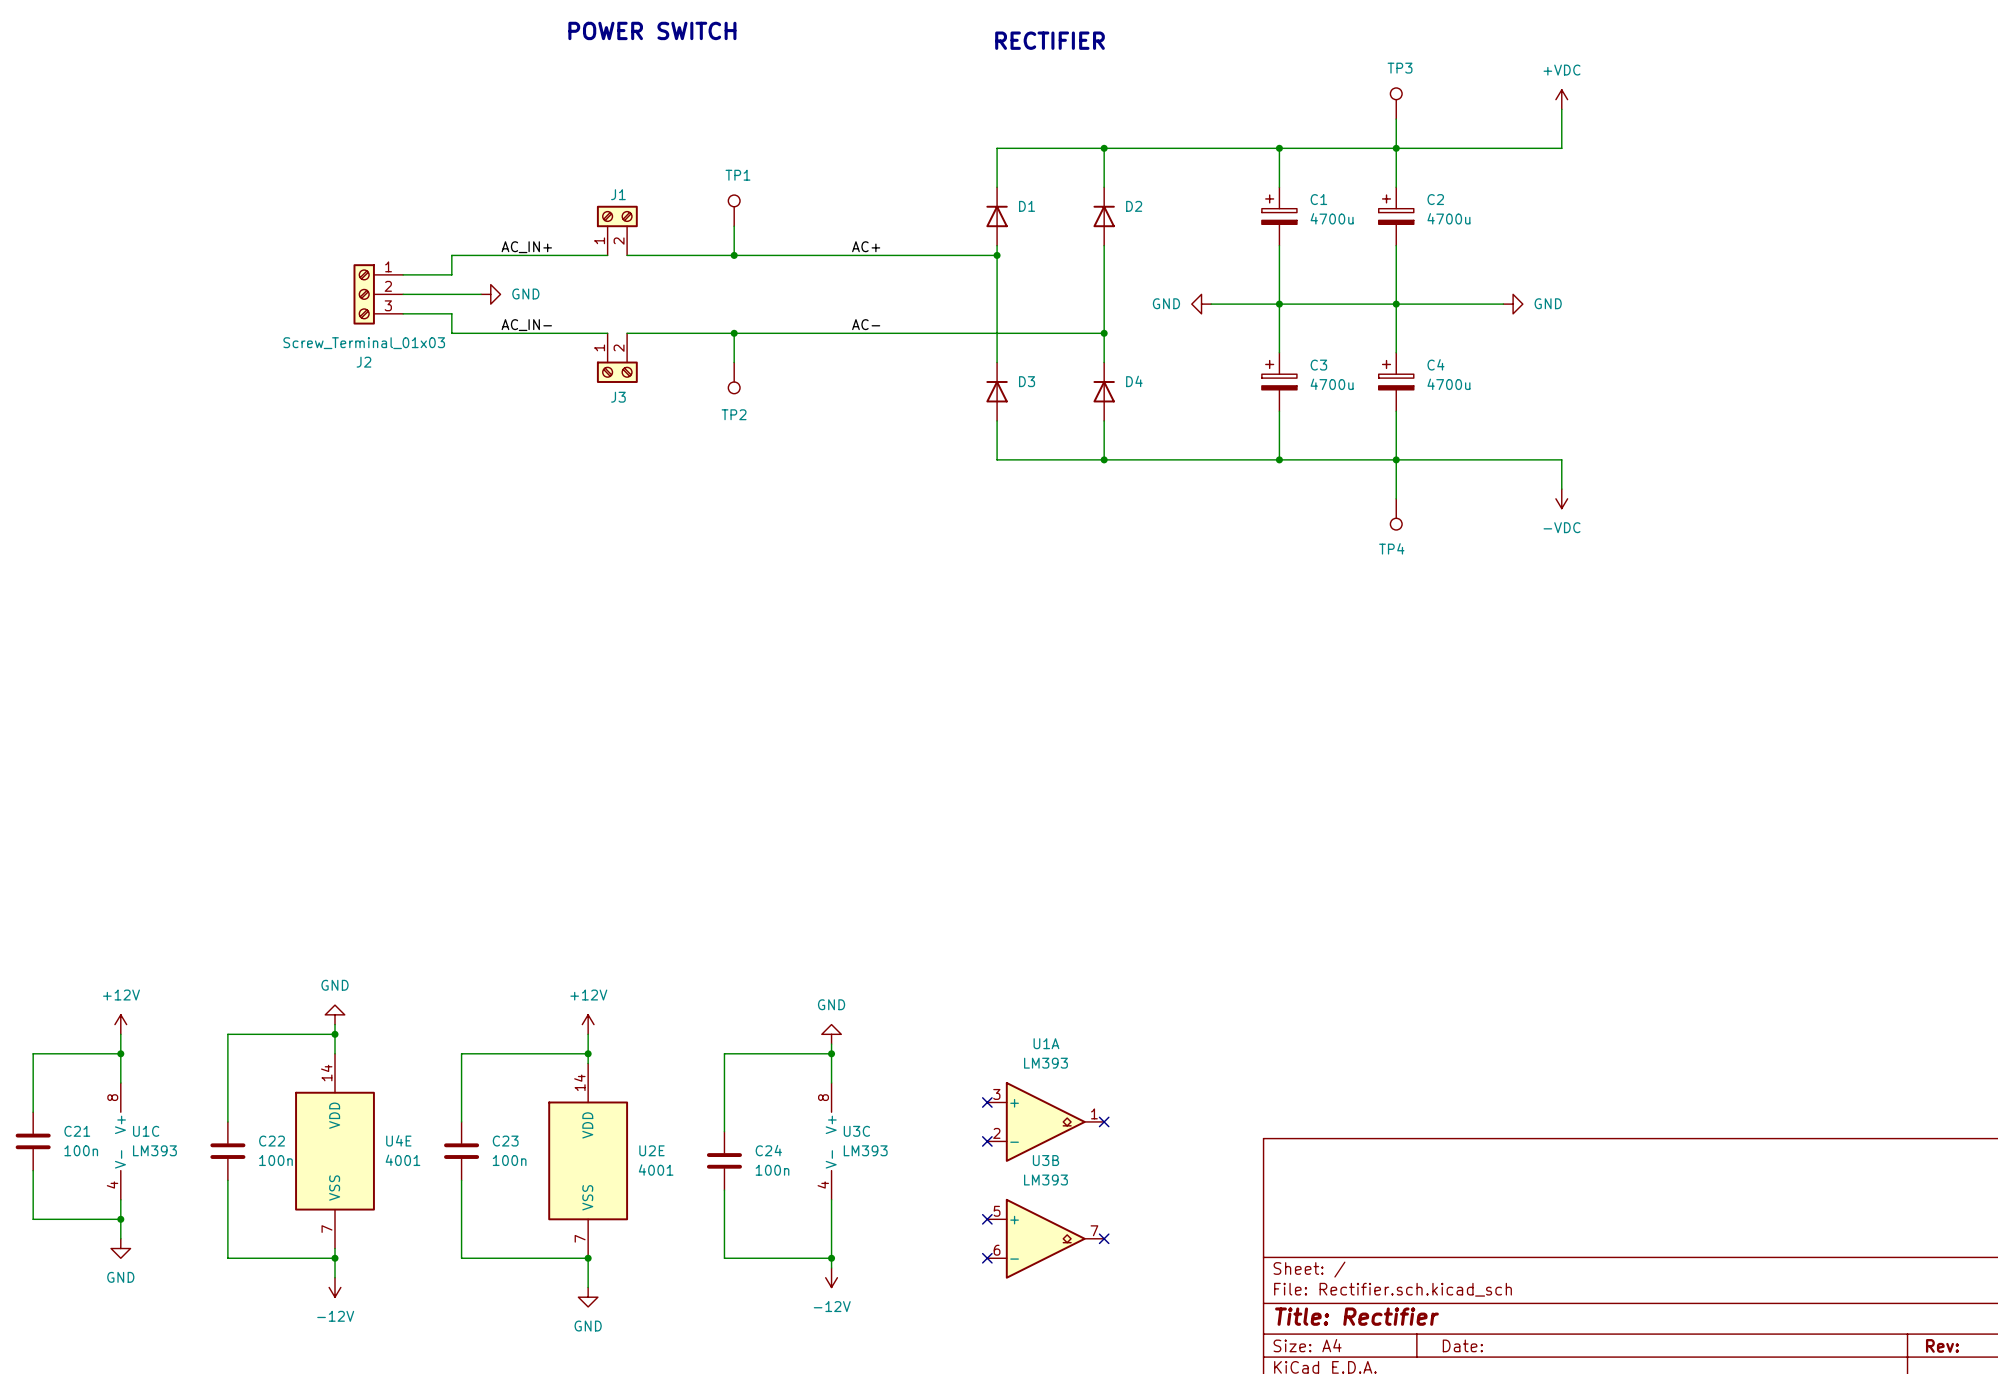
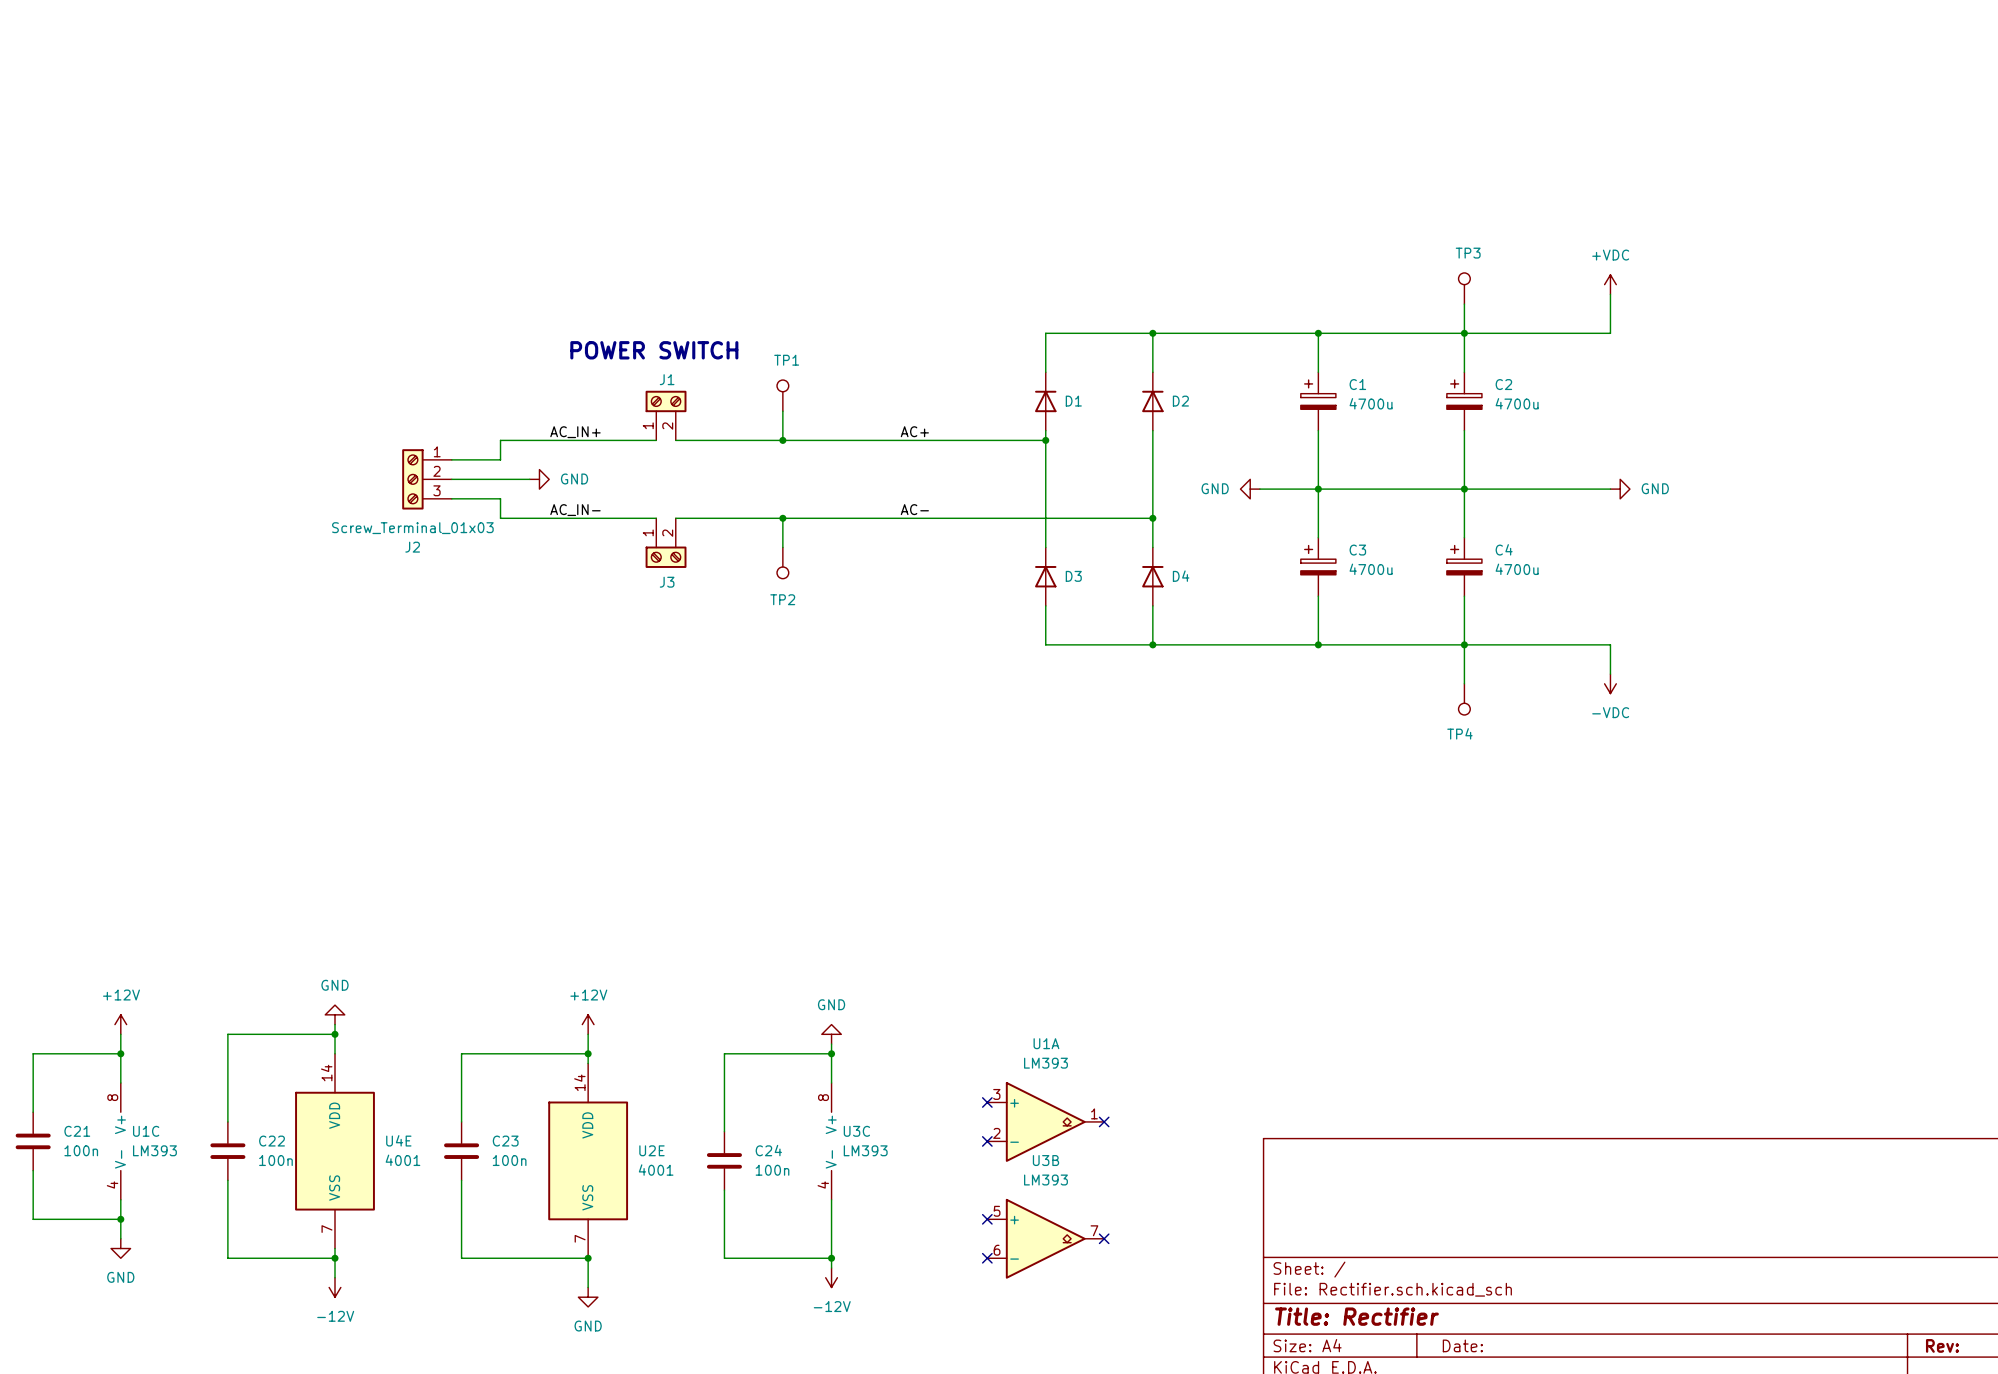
text: POWER SWITCH (652, 30) -> none
text: RECTIFIER (1050, 40) -> none
power symbol position: +VDC (1561, 99) -> +VDC (1610, 284)
TP3 position: (1396, 103) -> (1464, 288)
wire: (1561, 109) (1561, 148) (997, 148) (997, 187) -> none
wire: (1396, 119) (1396, 187) -> none
wire: (1104, 148) (1104, 187) -> (1152, 333) (1152, 372)
junction: (1104, 148) -> none
wire: (1279, 148) (1279, 187) -> (1318, 333) (1318, 372)
junction: (1279, 148) -> none
junction: (1396, 148) -> none
D1 name position: D1 (1027, 206) -> D1 (1073, 401)
D2 name position: D2 (1134, 206) -> D2 (1180, 401)
TP1 position: (734, 210) -> (782, 395)
D1 position: (997, 216) -> (1045, 401)
D2 position: (1104, 216) -> (1152, 401)
C1 position: (1279, 216) -> (1318, 401)
C2 position: (1396, 216) -> (1464, 401)
wire: (734, 226) (734, 255) -> (782, 411) (782, 440)
J1 position: (617, 230) -> (666, 415)
wire: (997, 245) (997, 362) -> (1045, 430) (1045, 547)
wire: (1104, 245) (1104, 362) -> (1152, 430) (1152, 547)
wire: (1279, 245) (1279, 352) -> (1318, 430) (1318, 537)
wire: (1396, 245) (1396, 352) -> none
label position: AC+ (866, 246) -> AC+ (914, 431)
label position: AC_IN+ (526, 247) -> AC_IN+ (575, 432)
wire: (607, 255) (451, 255) (451, 274) (403, 274) -> (656, 440) (500, 440) (500, 459) (451, 459)
wire: (627, 255) (997, 255) -> (675, 440) (1045, 440)
junction: (734, 255) -> none
junction: (997, 255) -> none
J2 position: (378, 294) -> (427, 479)
wire: (403, 294) (481, 294) -> (451, 479) (529, 479)
power symbol position: GND (490, 294) -> GND (539, 479)
wire: none -> (1610, 294) (1610, 333) (1104, 333)
power symbol: GND (1201, 304) -> none
wire: (1211, 304) (1503, 304) -> none
junction: (1279, 304) -> none
junction: (1396, 304) -> none
wire: none -> (1464, 304) (1464, 372)
power symbol: GND (1513, 304) -> none
wire: (403, 313) (451, 313) (451, 333) (607, 333) -> (451, 498) (500, 498) (500, 518) (656, 518)
label position: AC- (866, 324) -> AC- (914, 509)
label position: AC_IN- (526, 325) -> AC_IN- (575, 510)
wire: (627, 333) (1045, 333) -> (1045, 372) (1045, 333)
wire: (734, 333) (734, 362) -> (782, 518) (782, 547)
junction: (734, 333) -> none
junction: (1104, 333) -> none
junction: none -> (1152, 333)
junction: none -> (1318, 333)
junction: none -> (1464, 333)
text: none -> POWER SWITCH (654, 350)
J3 position: (617, 358) -> (666, 543)
TP2 position: (734, 378) -> (782, 563)
D3 name position: D3 (1027, 381) -> D3 (1073, 576)
D4 name position: D4 (1134, 381) -> D4 (1181, 576)
C3 position: (1279, 381) -> (1318, 566)
C4 position: (1396, 381) -> (1464, 566)
D3 position: (997, 391) -> (1045, 576)
D4 position: (1104, 391) -> (1152, 576)
wire: (1279, 411) (1279, 459) -> (1318, 596) (1318, 644)
wire: (1396, 411) (1396, 498) -> none
wire: (997, 420) (997, 459) (1561, 459) (1561, 489) -> (1045, 605) (1045, 644) (1610, 644) (1610, 674)
wire: (1104, 420) (1104, 459) -> (1152, 605) (1152, 644)
wire: none -> (1464, 430) (1464, 537)
junction: none -> (782, 440)
junction: none -> (1045, 440)
junction: (1104, 459) -> none
junction: (1279, 459) -> none
junction: (1396, 459) -> none
power symbol: none -> GND (1250, 489)
wire: none -> (1259, 489) (1610, 489)
junction: none -> (1318, 489)
junction: none -> (1464, 489)
power symbol: none -> GND (1620, 489)
power symbol position: -VDC (1561, 498) -> -VDC (1610, 683)
TP4 position: (1396, 514) -> (1464, 699)
wire: none -> (675, 518) (1152, 518)
junction: none -> (782, 518)
junction: none -> (1152, 518)
wire: none -> (1464, 596) (1464, 683)
junction: none -> (1152, 644)
junction: none -> (1318, 644)
junction: none -> (1464, 644)

